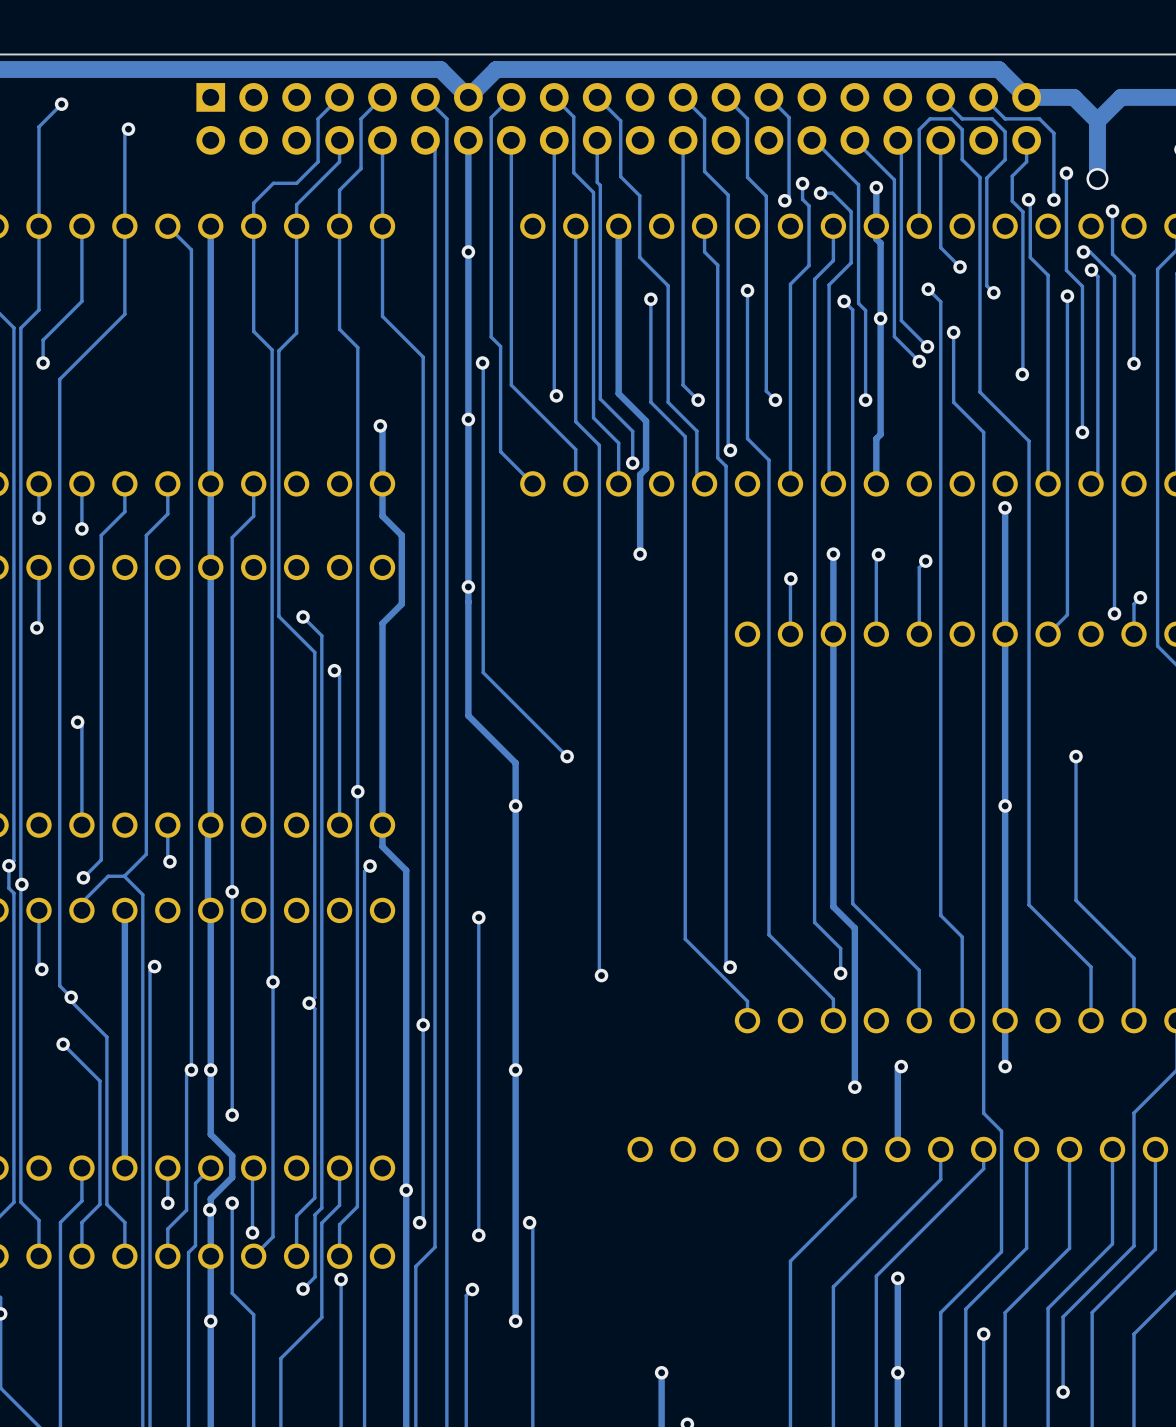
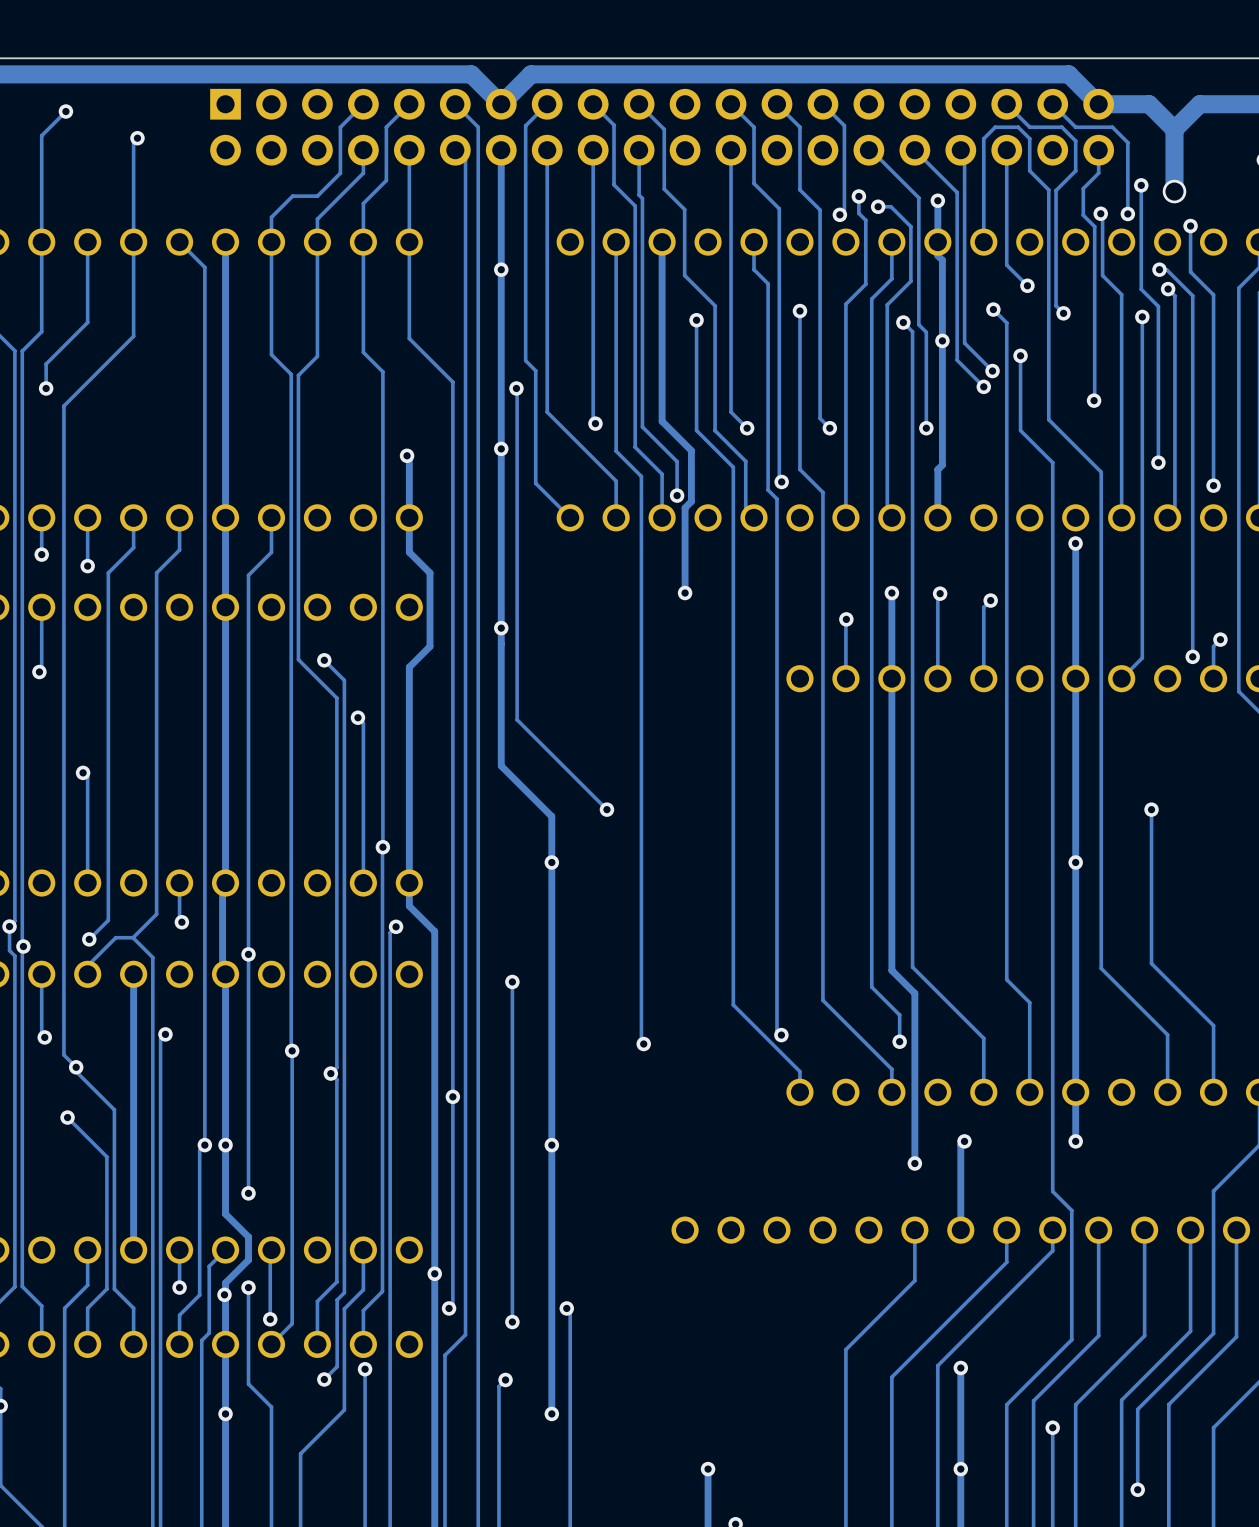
track: none -> (1213, 389) (1213, 485)
via position: (1133, 363) -> (1213, 485)

